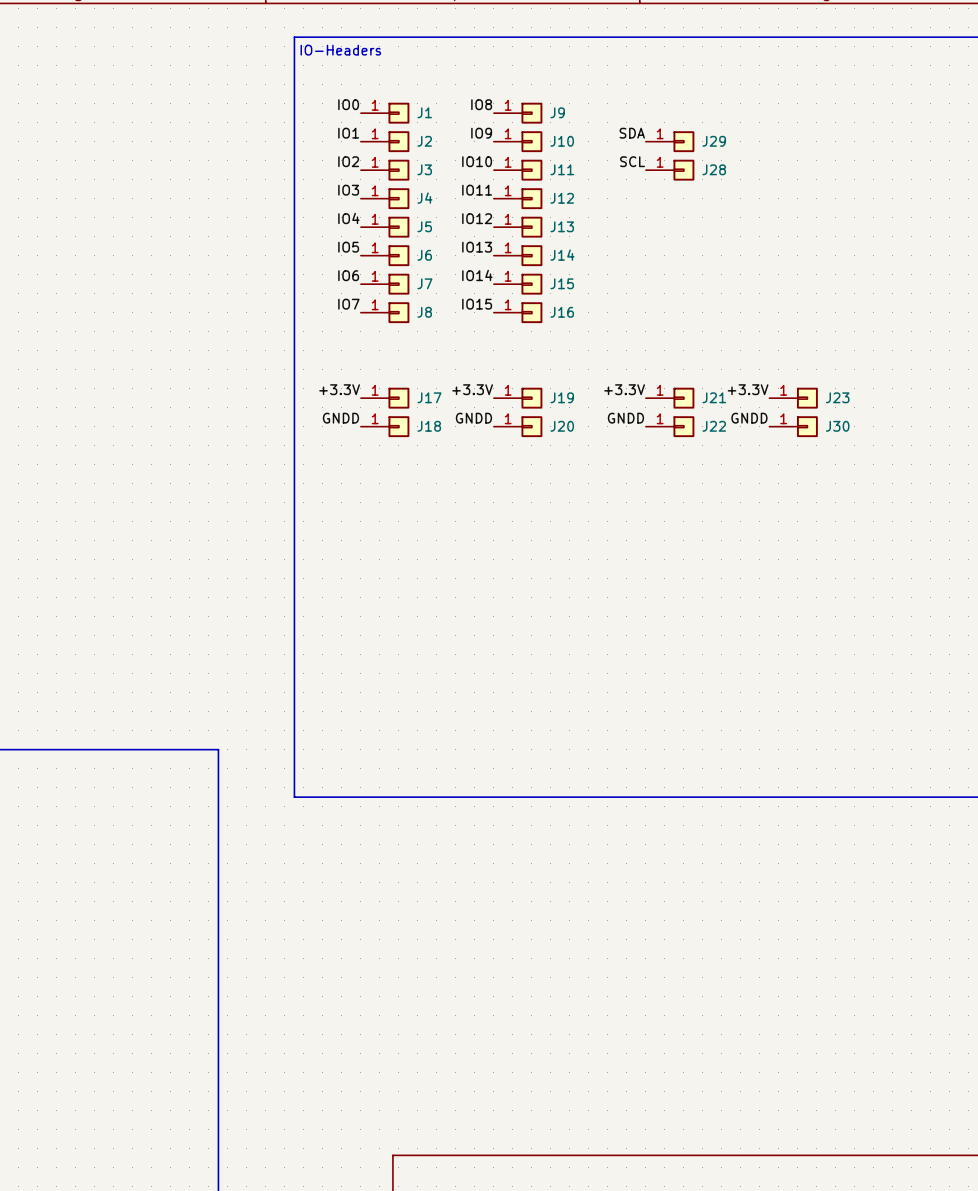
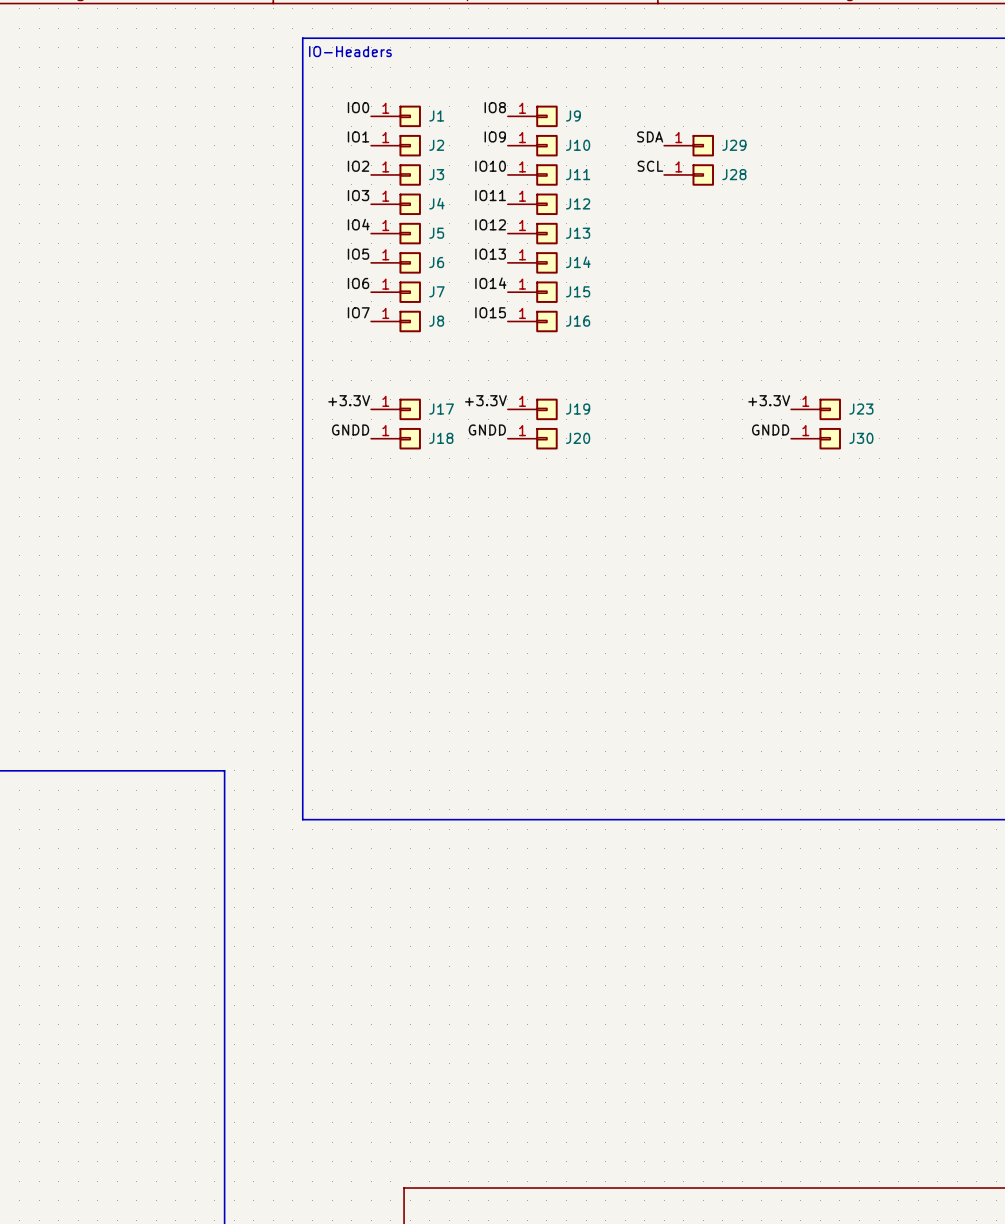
label: +3.3V (624, 389) -> none
J21: (670, 398) -> none
label: GNDD (625, 418) -> none
J22: (670, 426) -> none

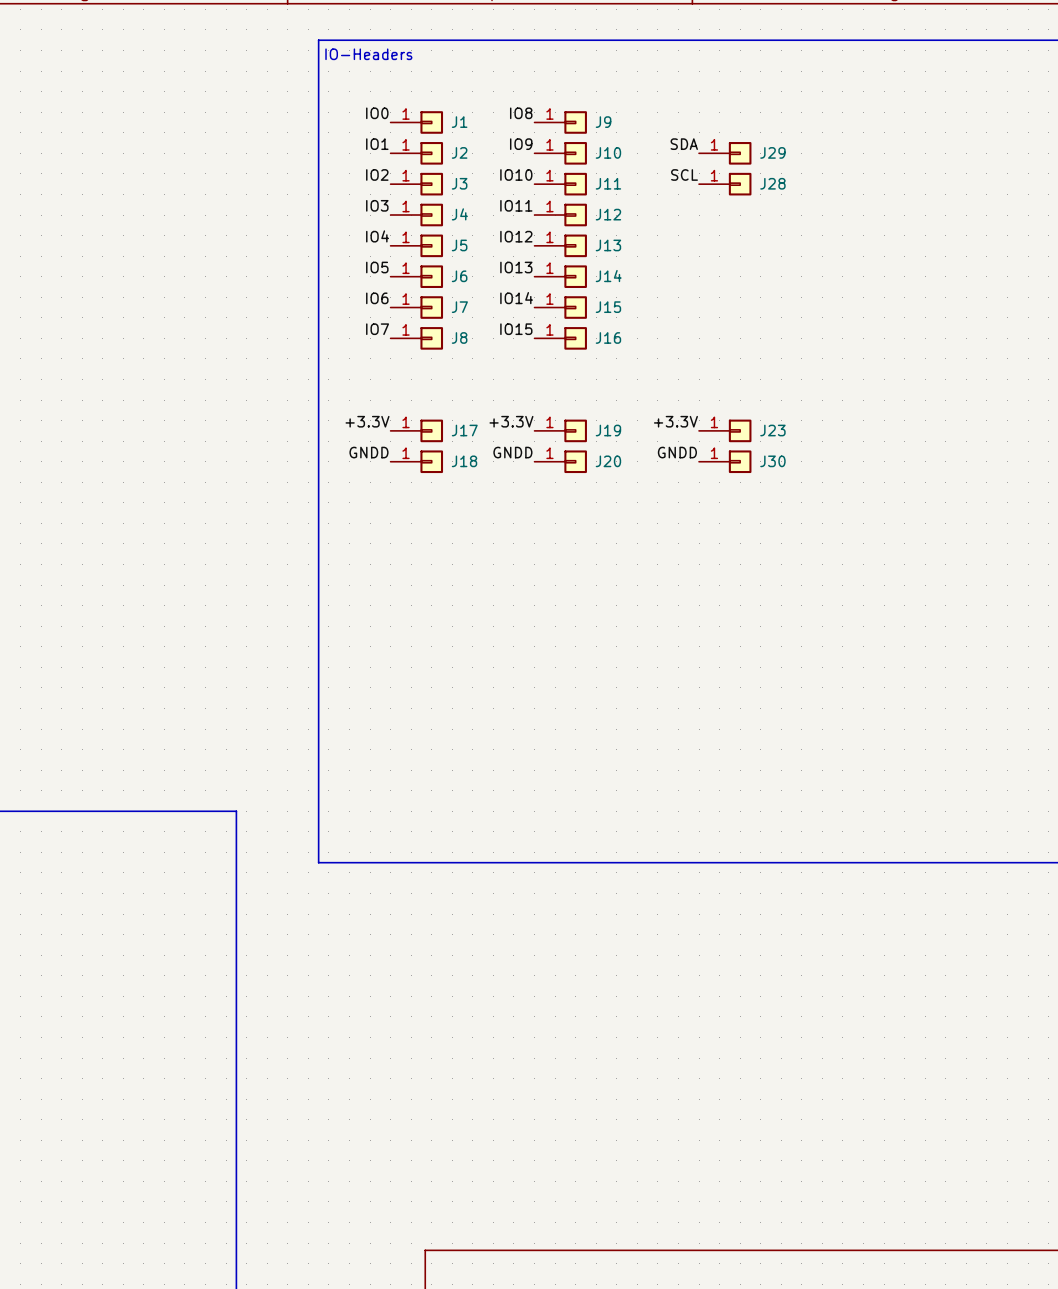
label position: +3.3V (769, 400) -> +3.3V (675, 421)
J23 position: (816, 409) -> (725, 430)
label position: GNDD (770, 429) -> GNDD (677, 452)
J30 position: (816, 438) -> (725, 461)

